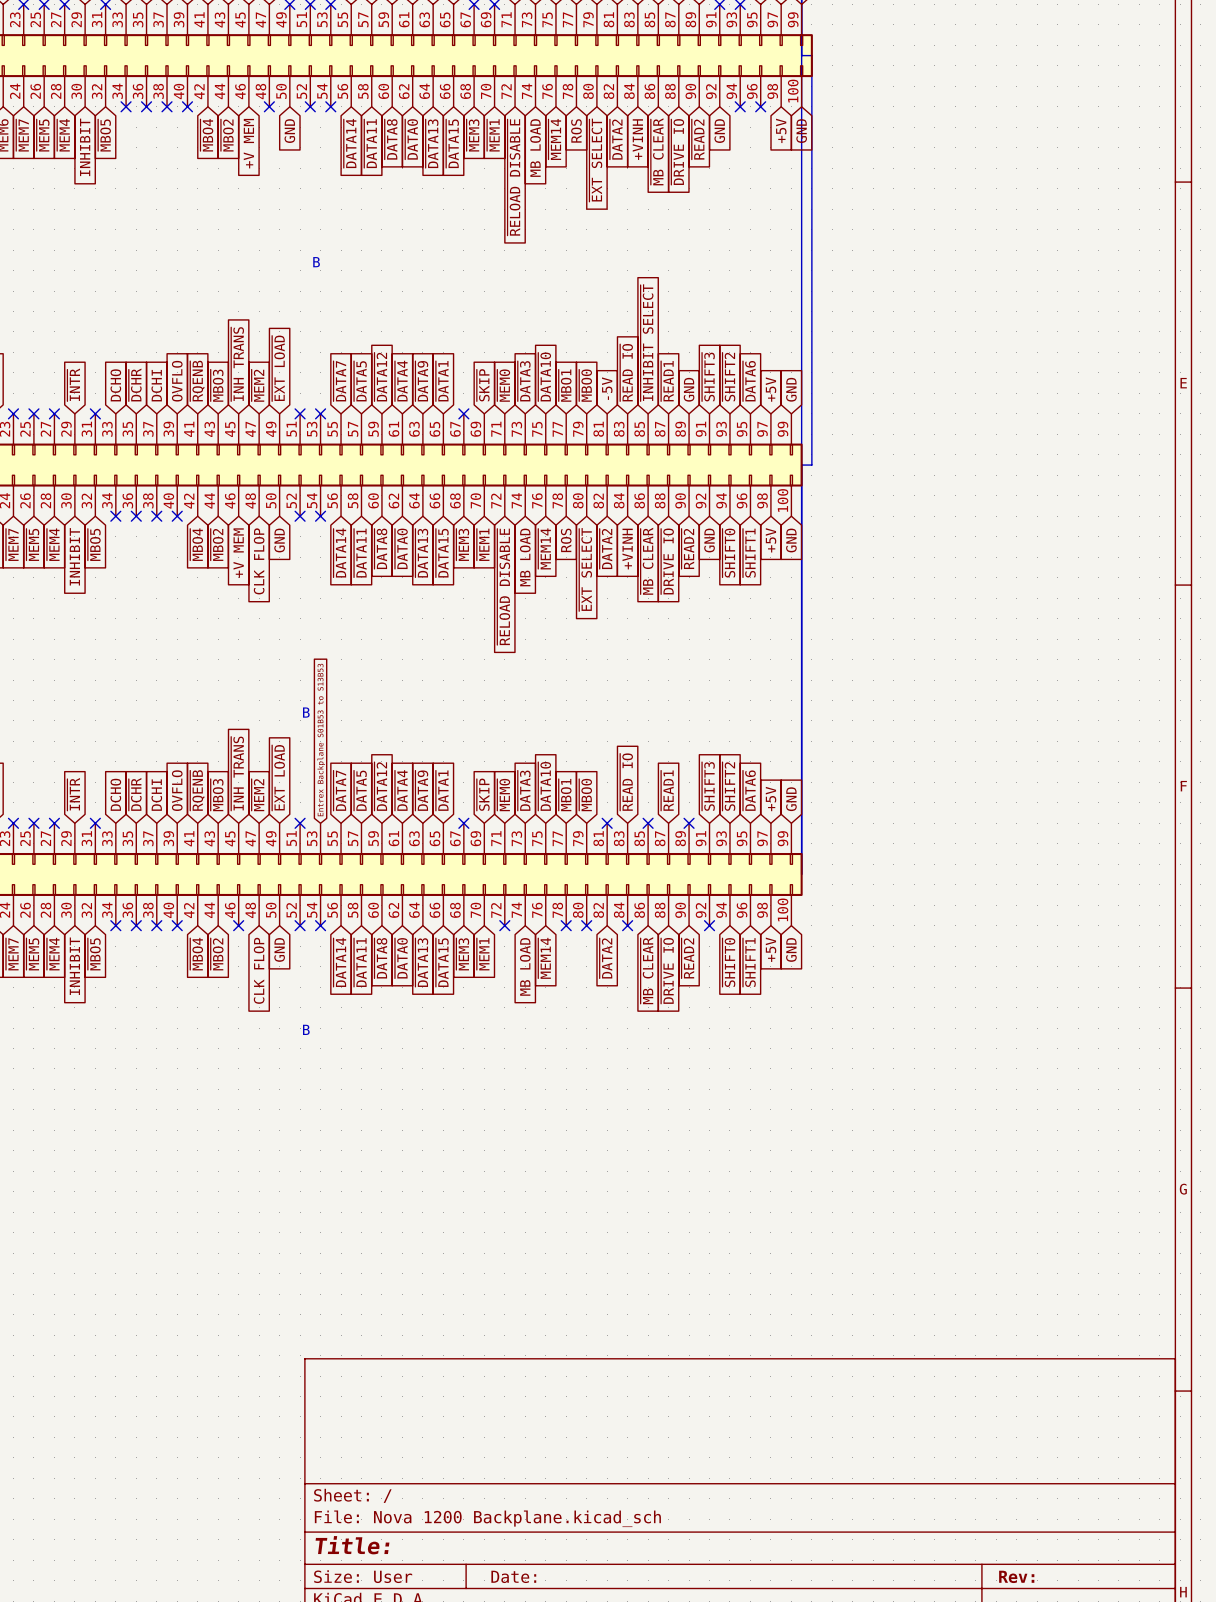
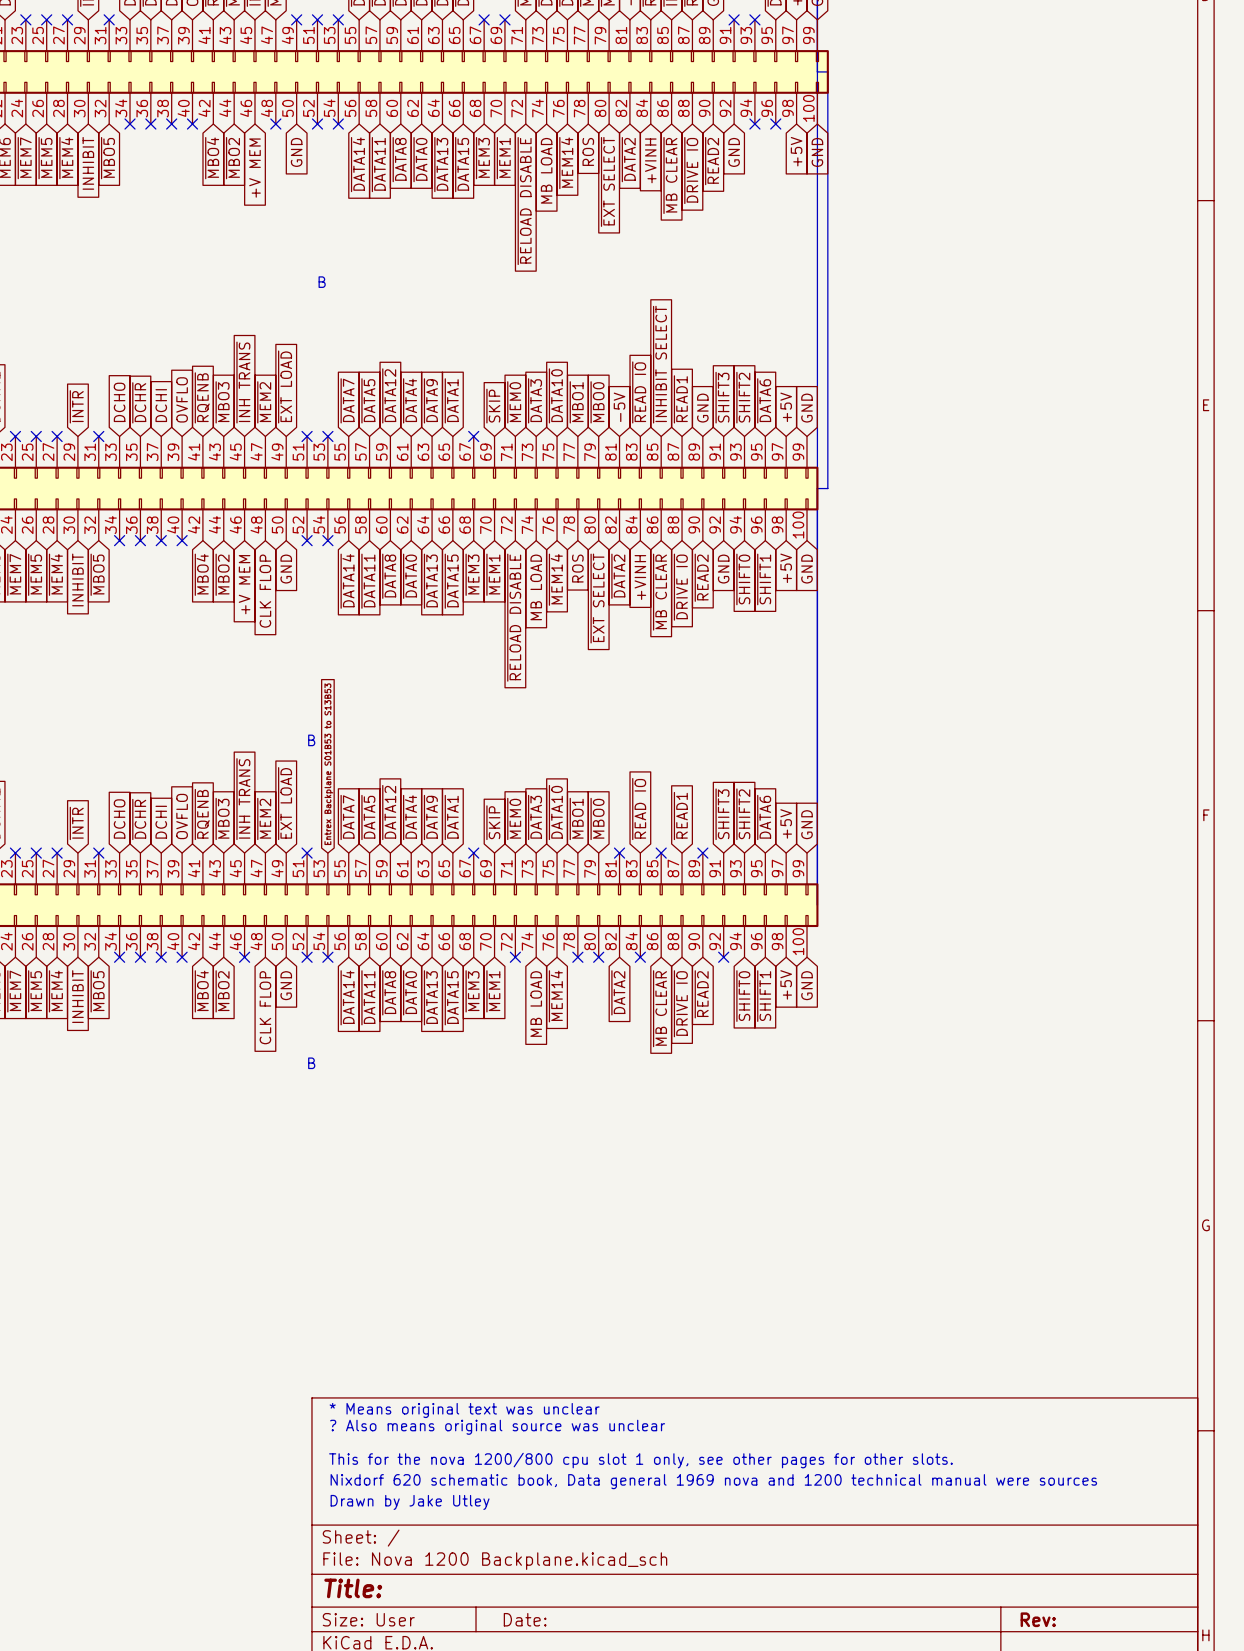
text: none -> * Means original text was unclear (464, 1410)
text: none -> ? Also means original source was unclear (497, 1427)
text: none -> This for the nova 1200/800 cpu slot 1 only, see other pages for other slots. (640, 1460)
text: none -> Nixdorf 620 schematic book, Data general 1969 nova and 1200 technical manual were sources (713, 1481)
text: none -> Drawn by Jake Utley (410, 1502)

